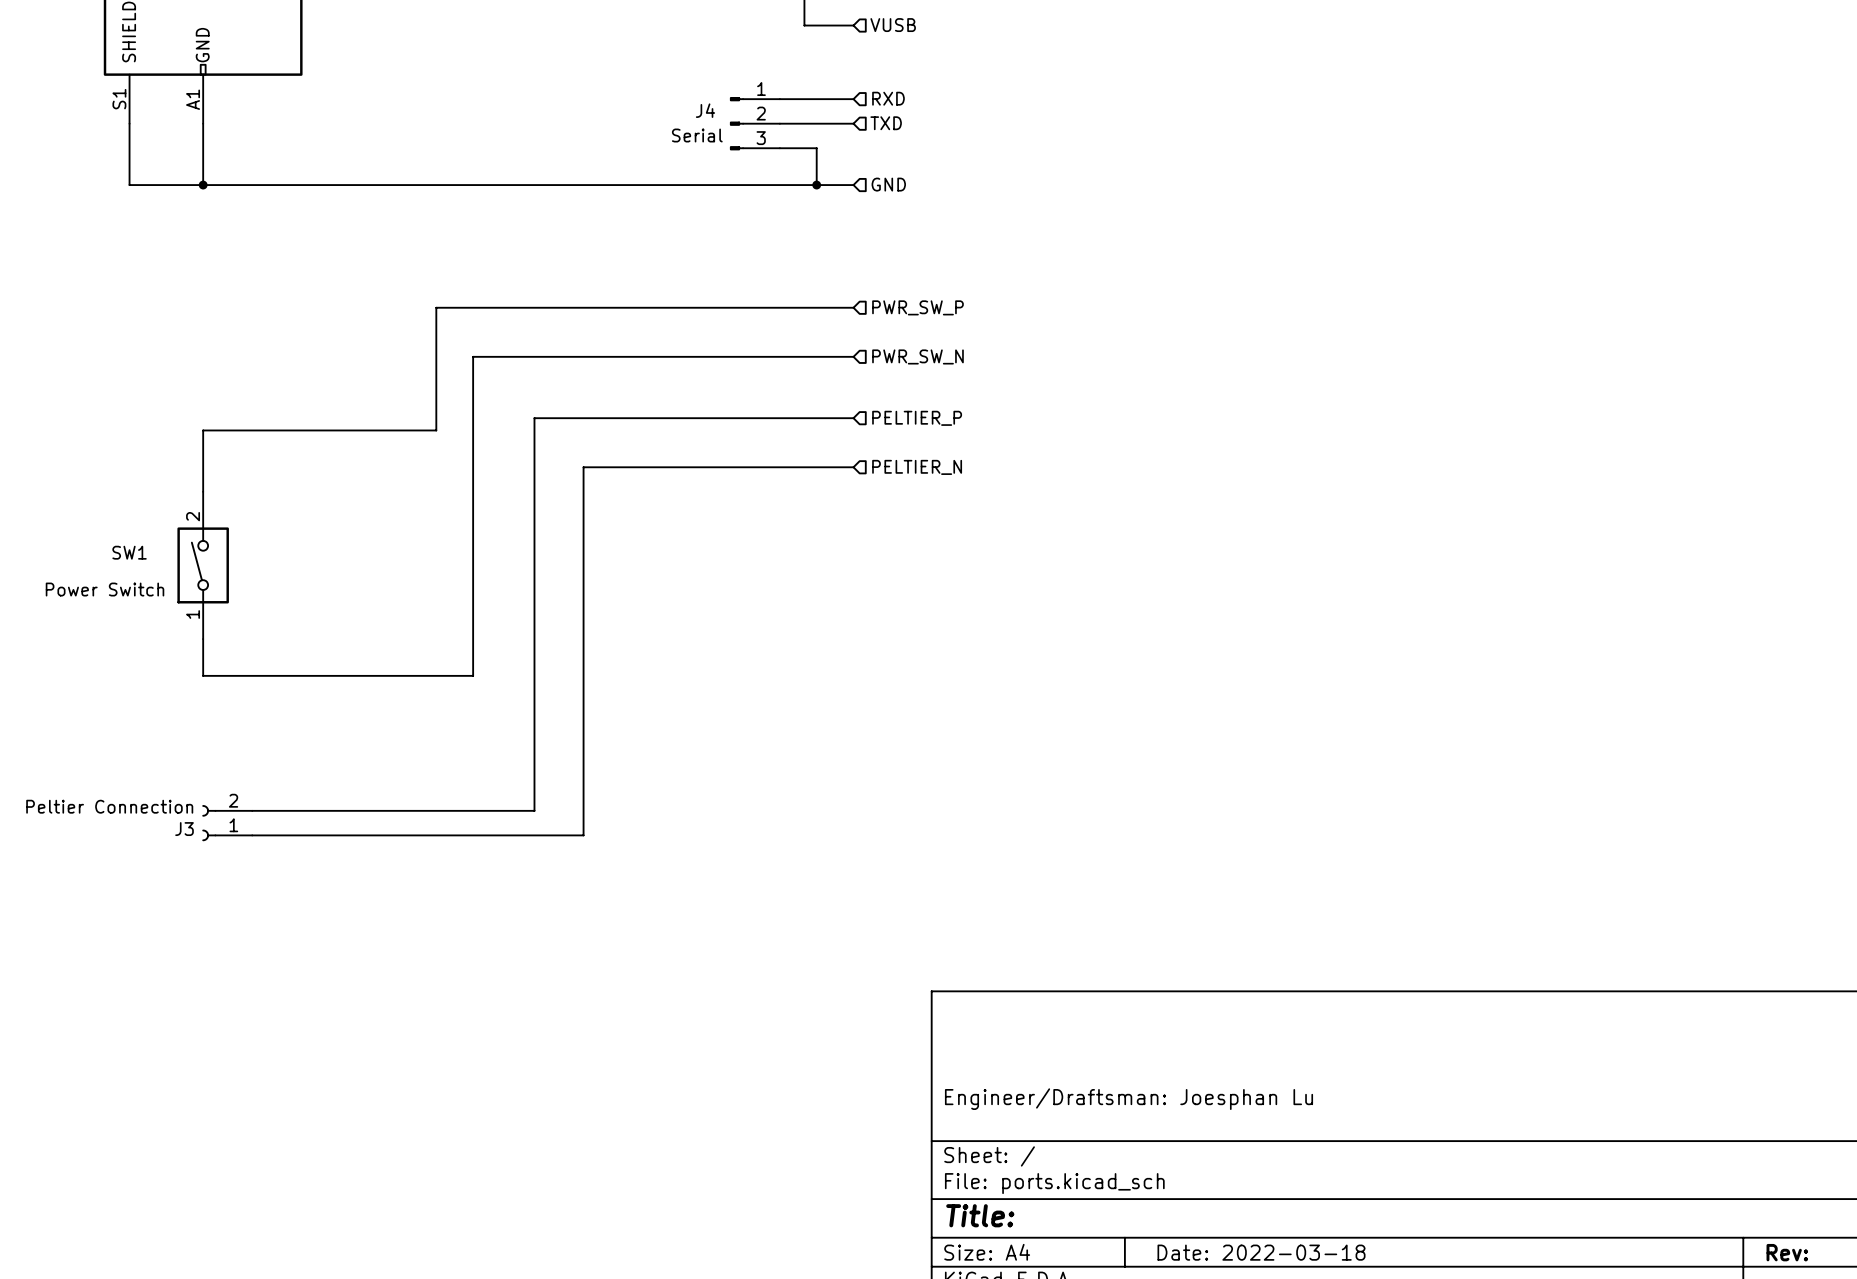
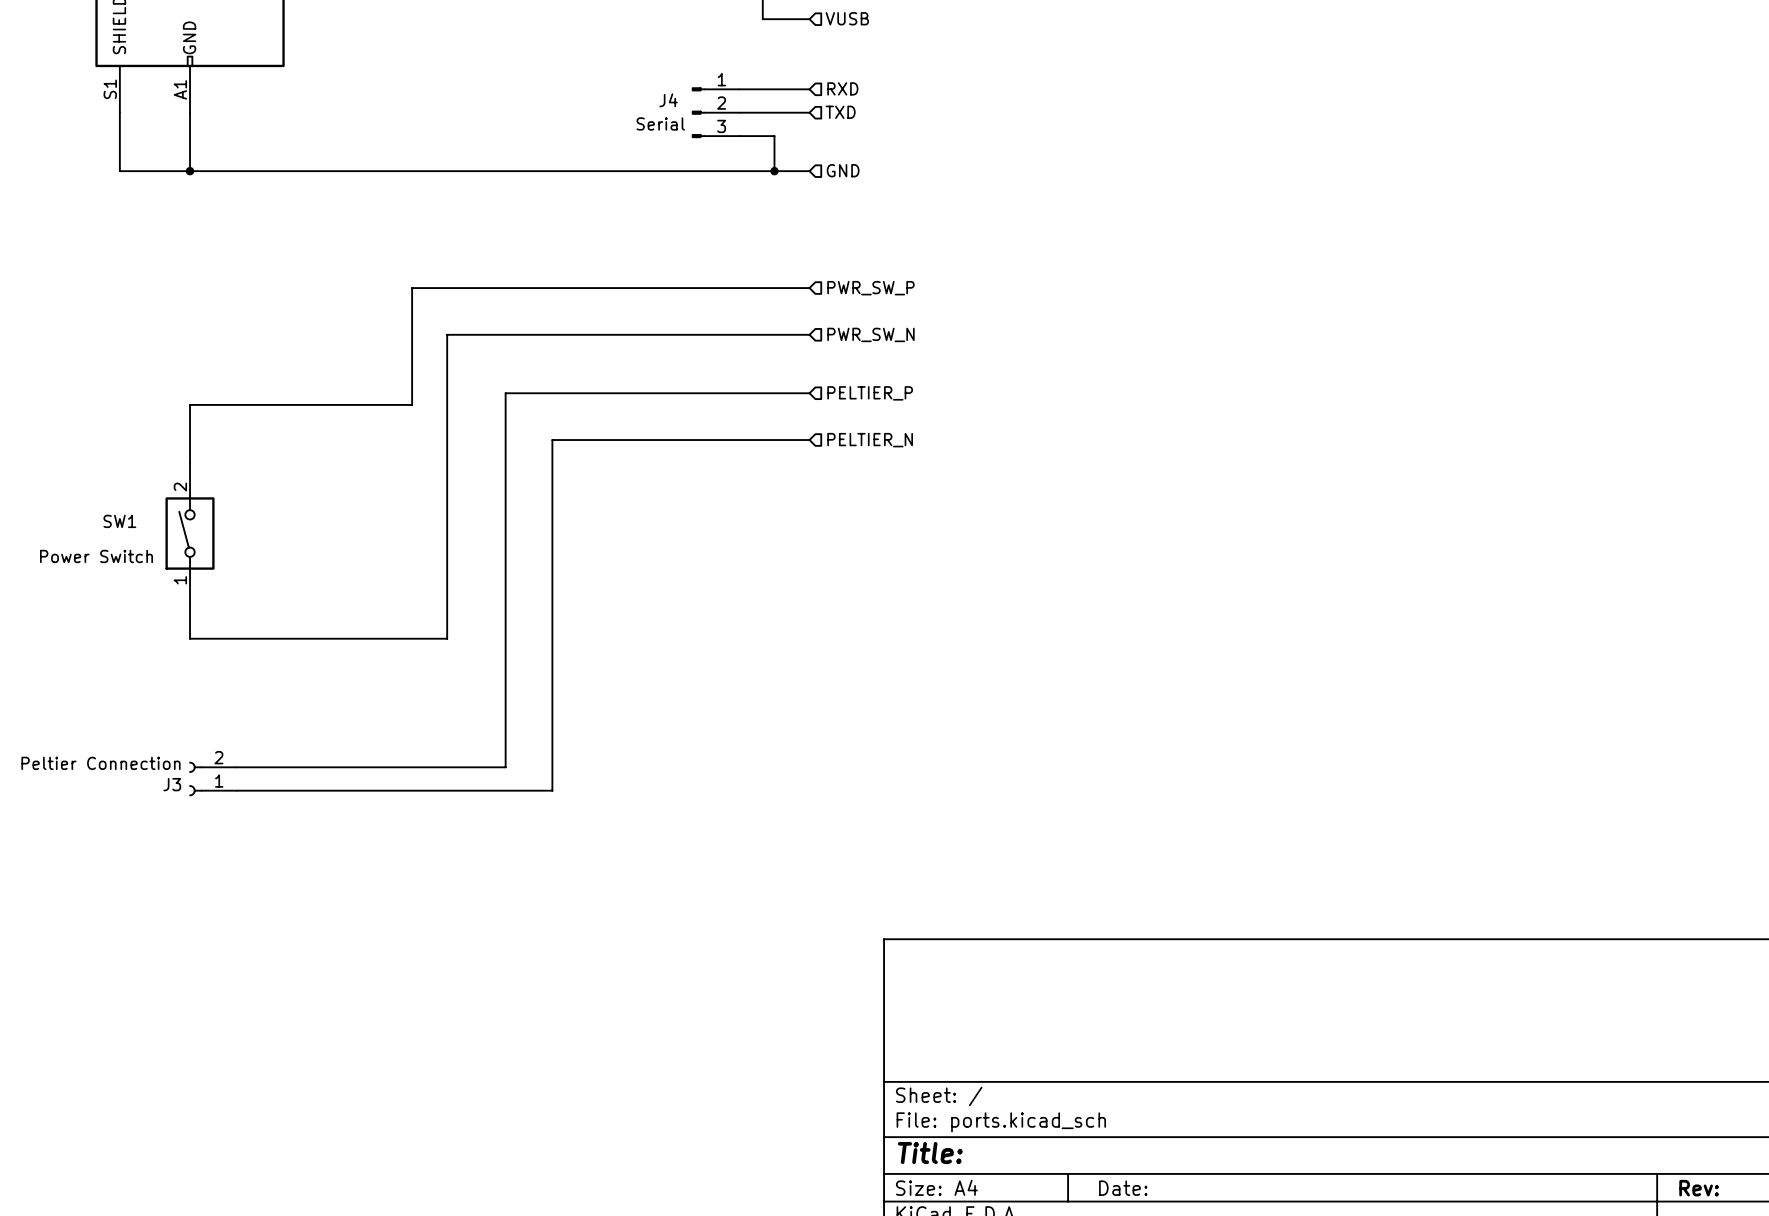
title block: Engineer/Draftsman: Joesphan Lu (1129, 1099) -> none
title block: Date: 2022-03-18 (1261, 1252) -> Date: (1123, 1188)

